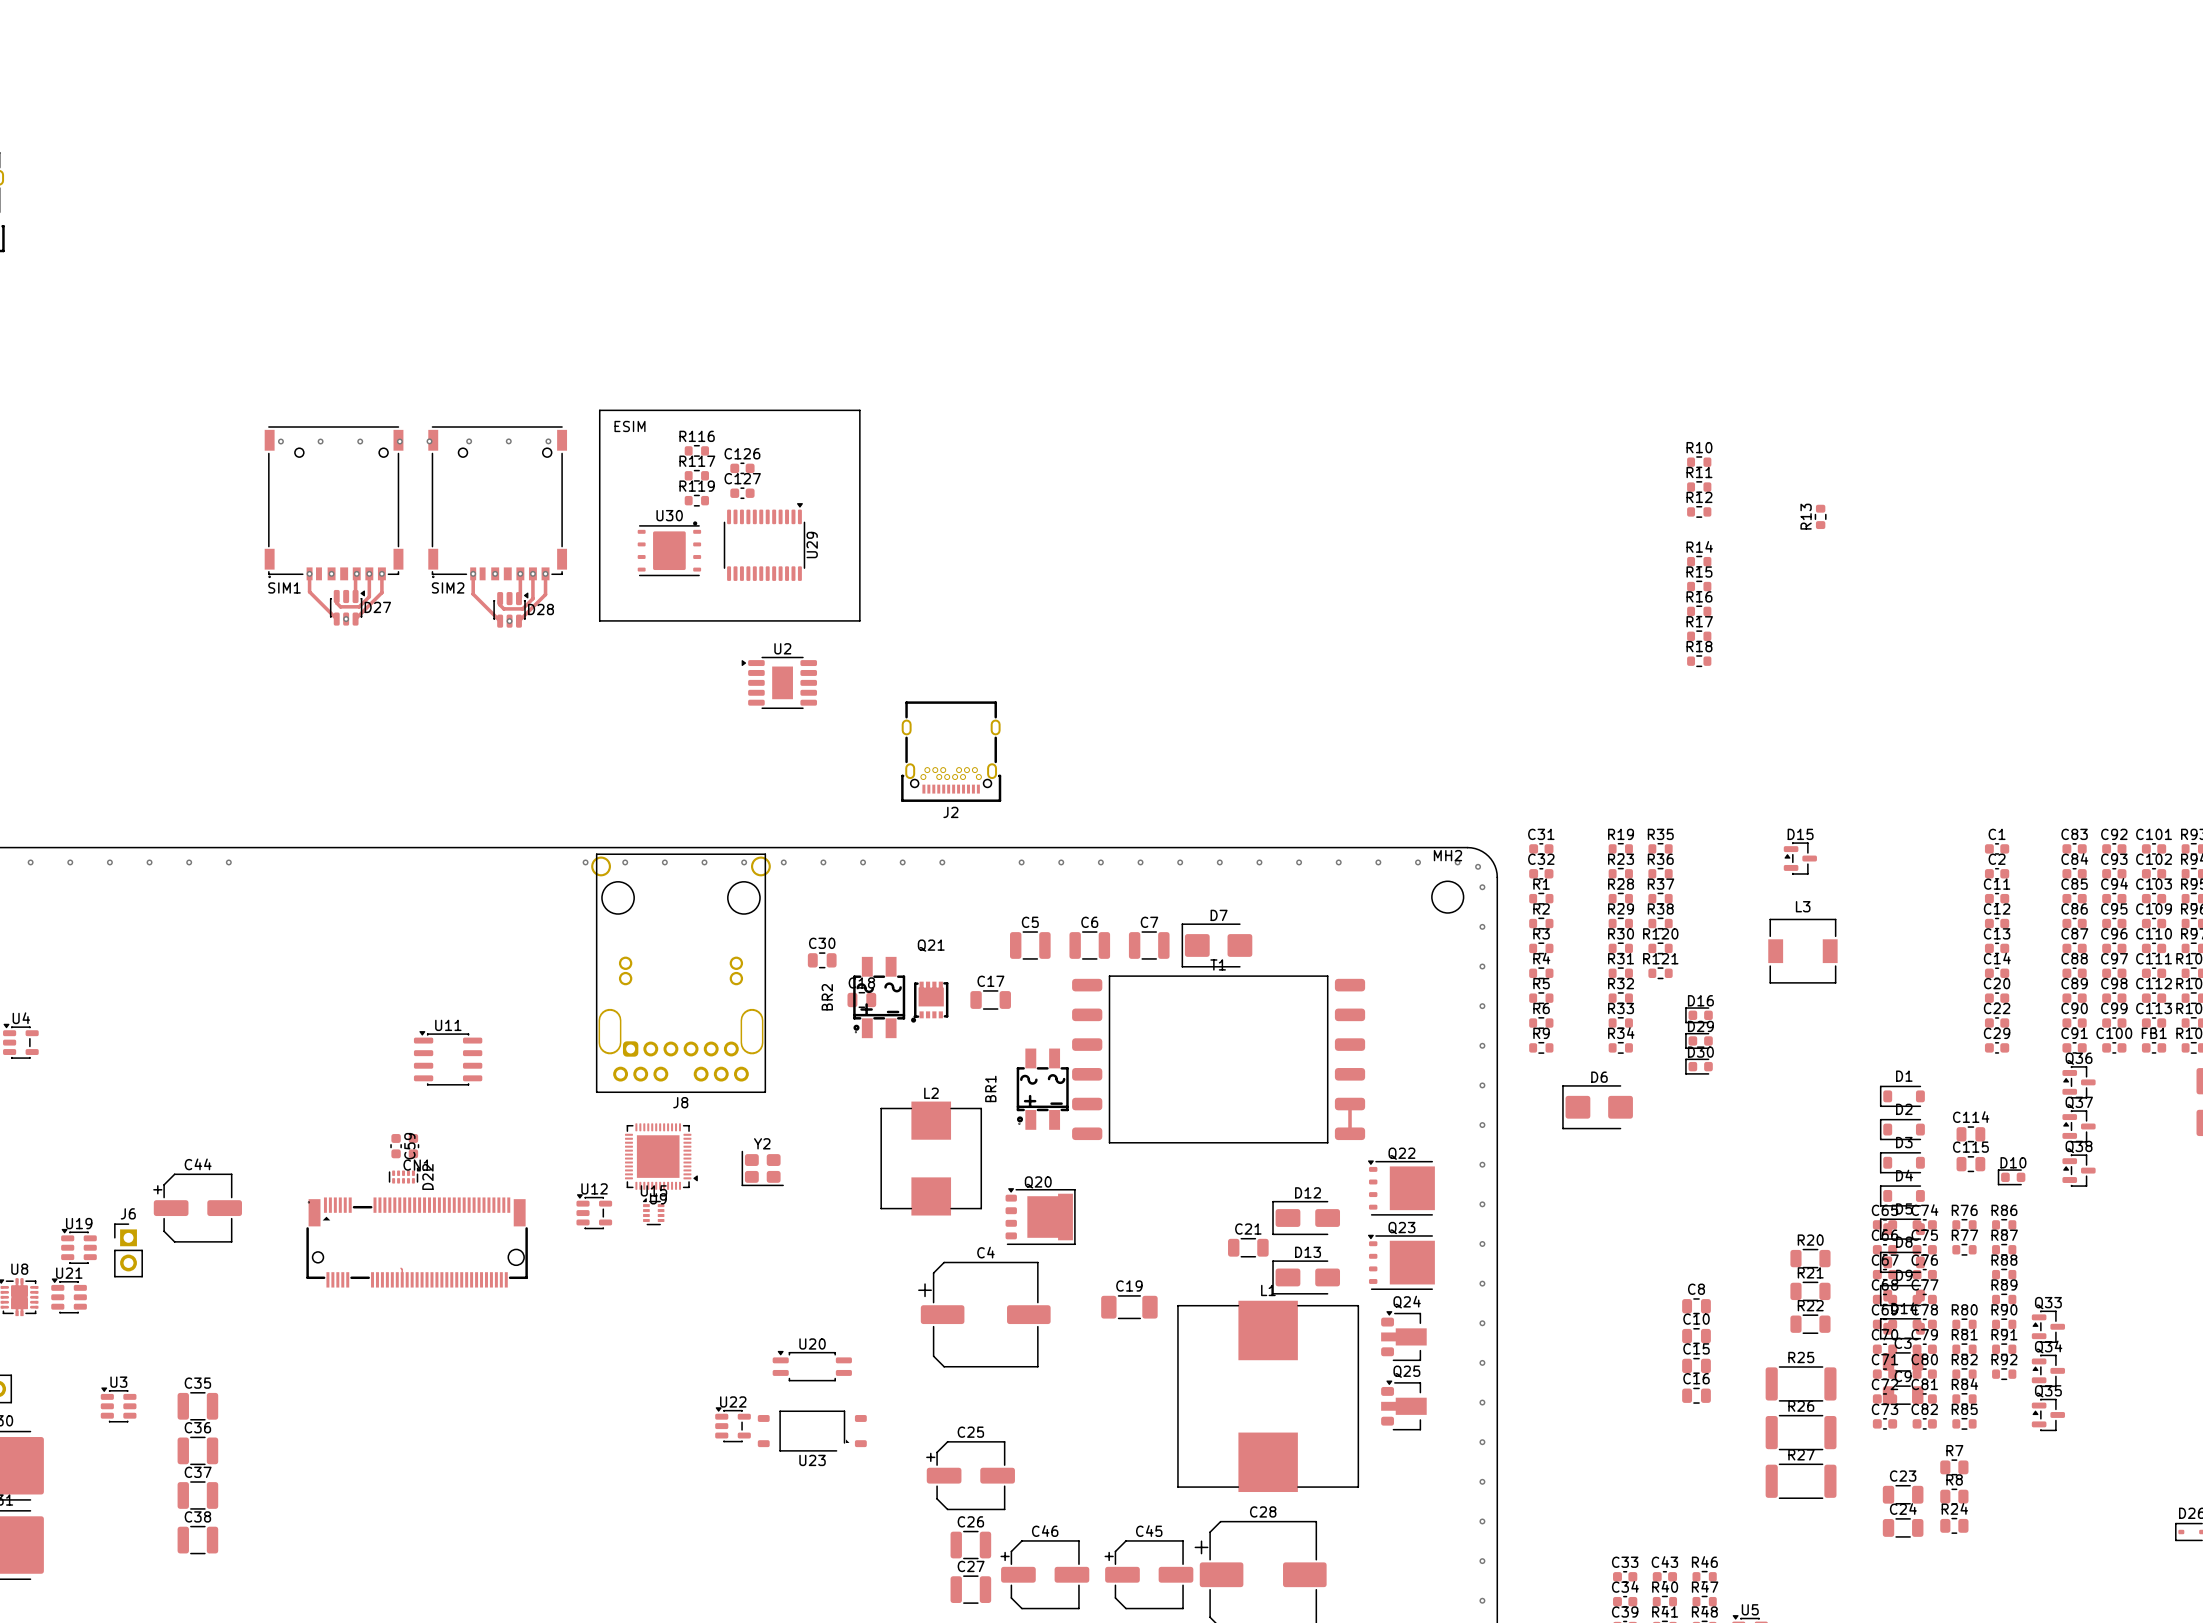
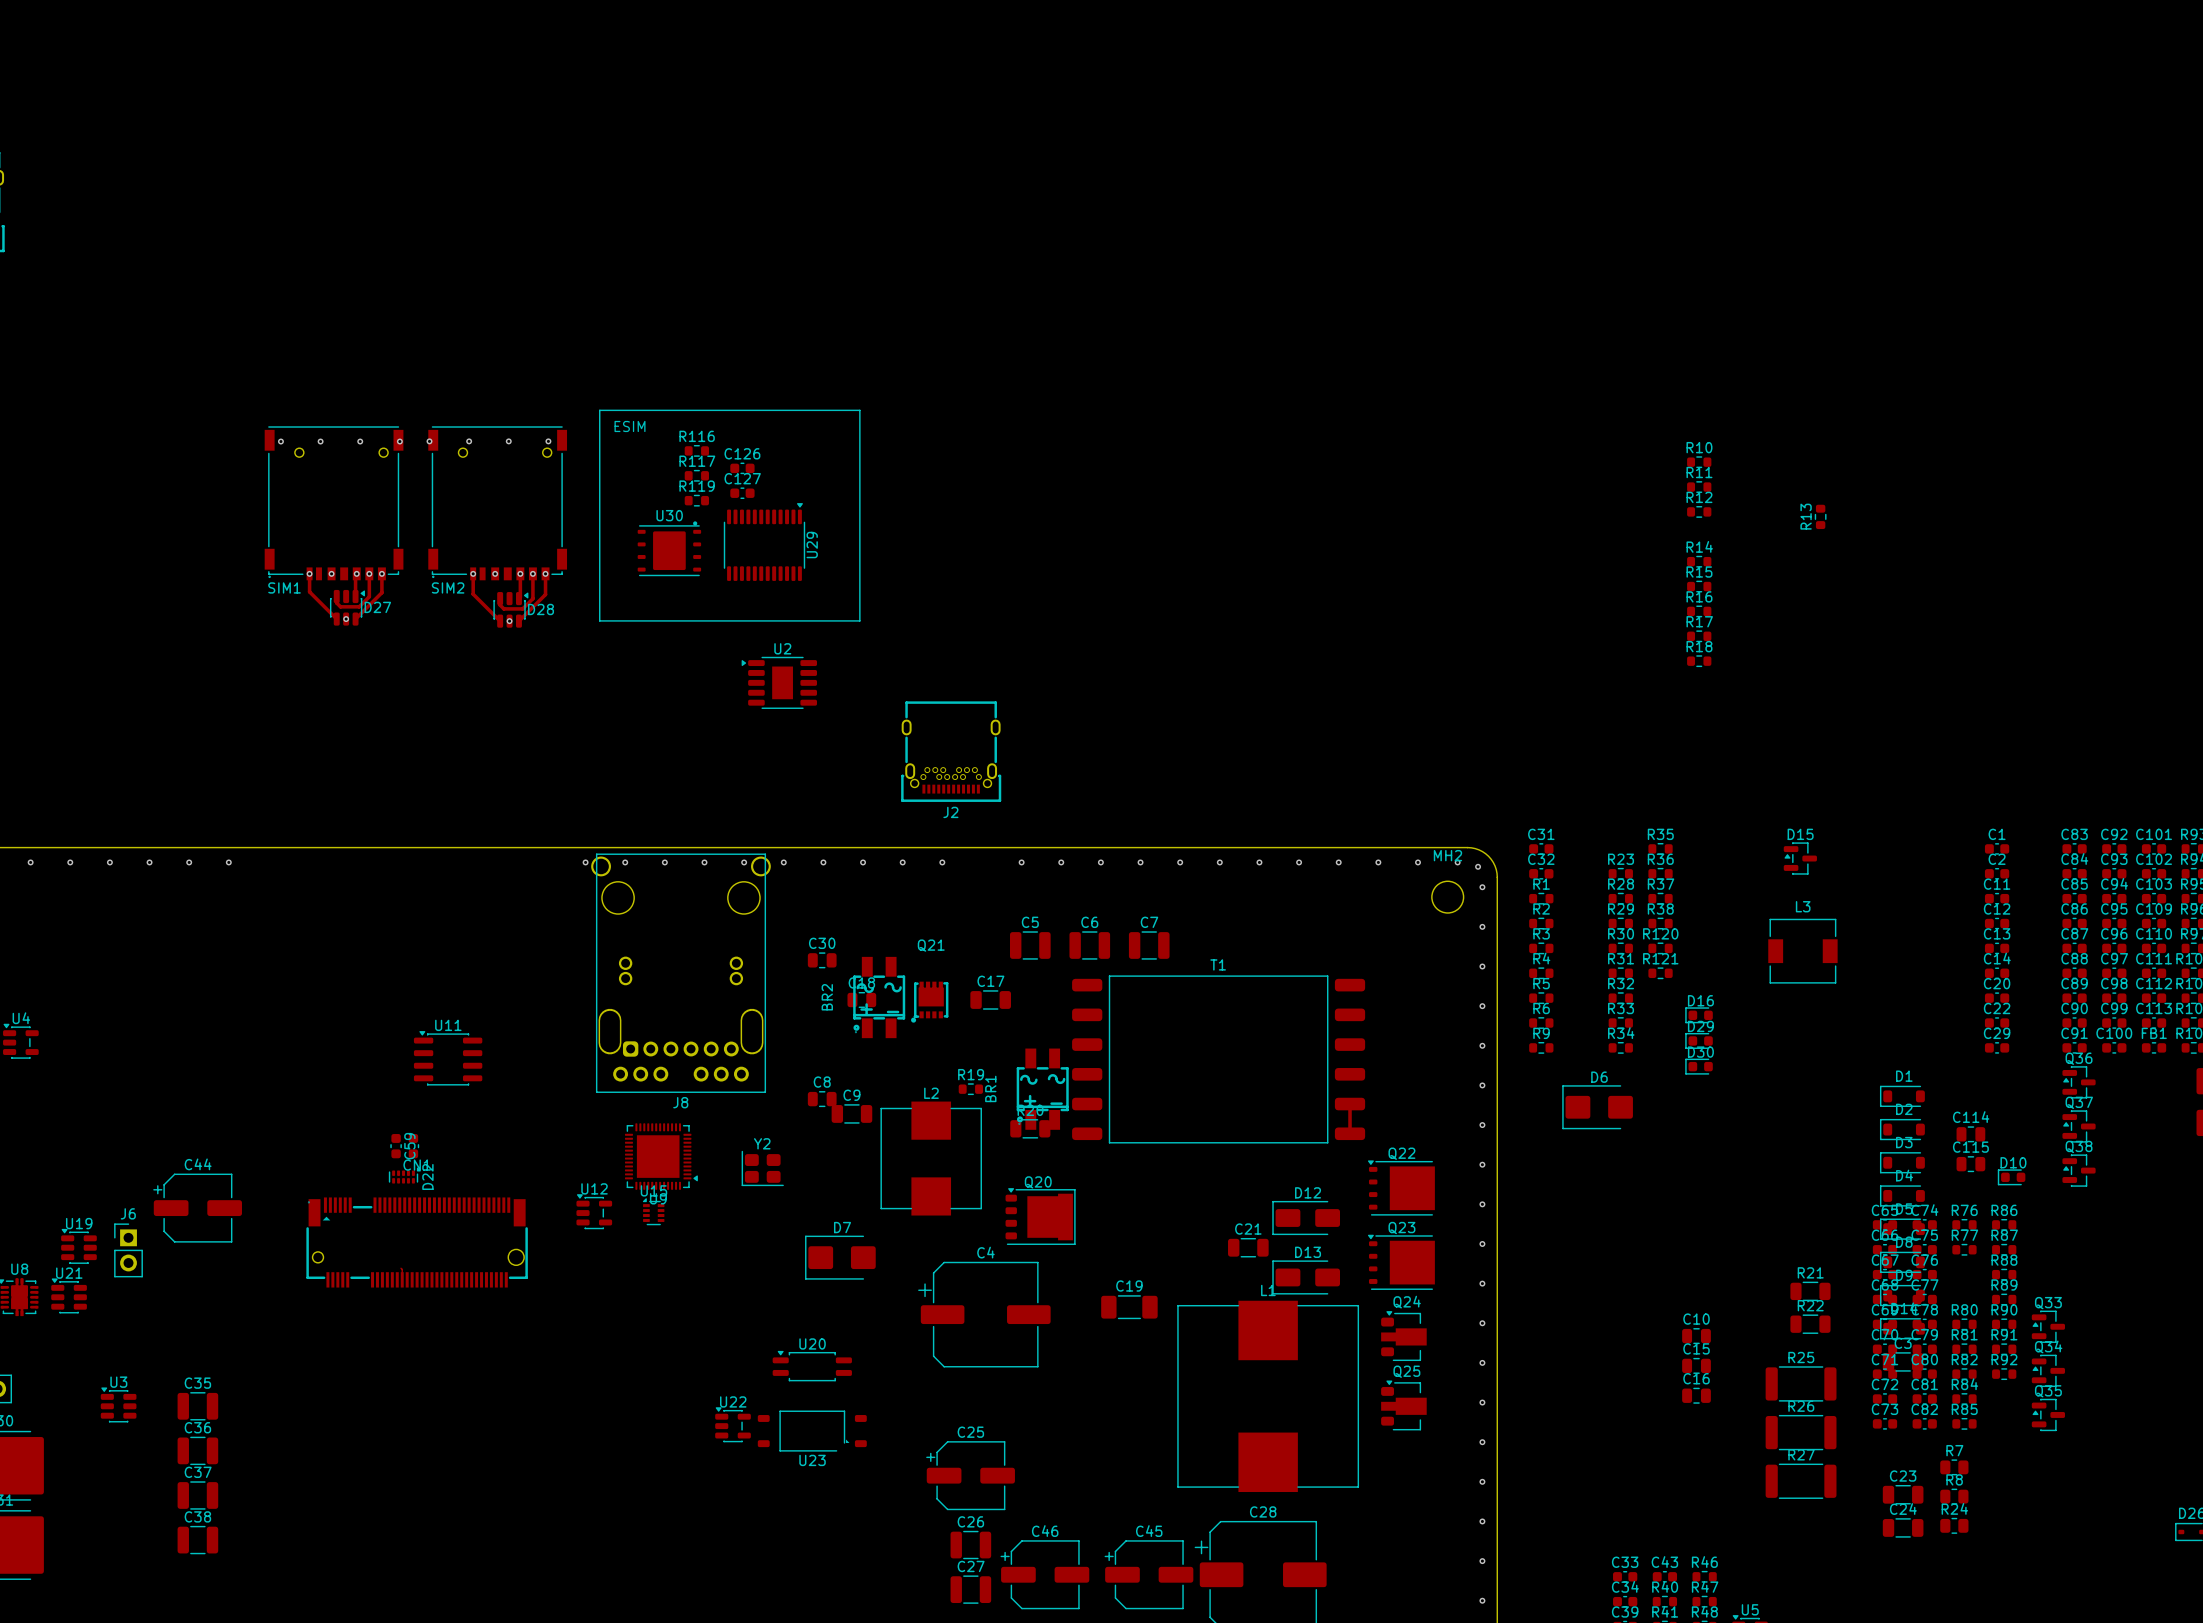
R19 position: (1620, 848) -> (970, 1089)
D7 position: (1217, 945) -> (840, 1257)
R20 position: (1810, 1258) -> (1030, 1128)
C8 position: (1696, 1306) -> (822, 1099)
C9 position: (1903, 1395) -> (851, 1113)

